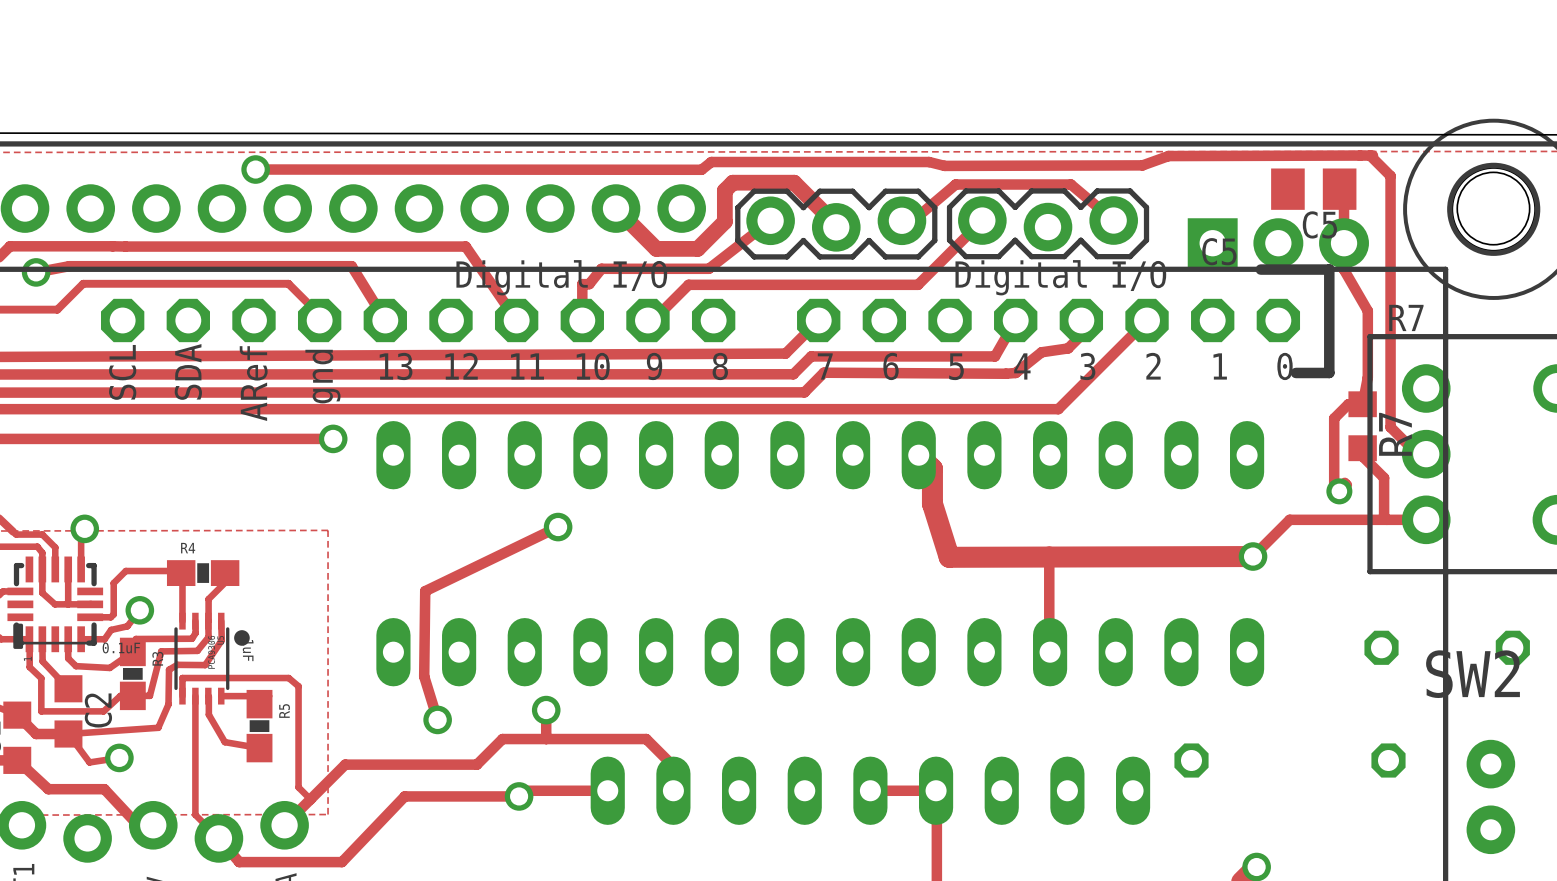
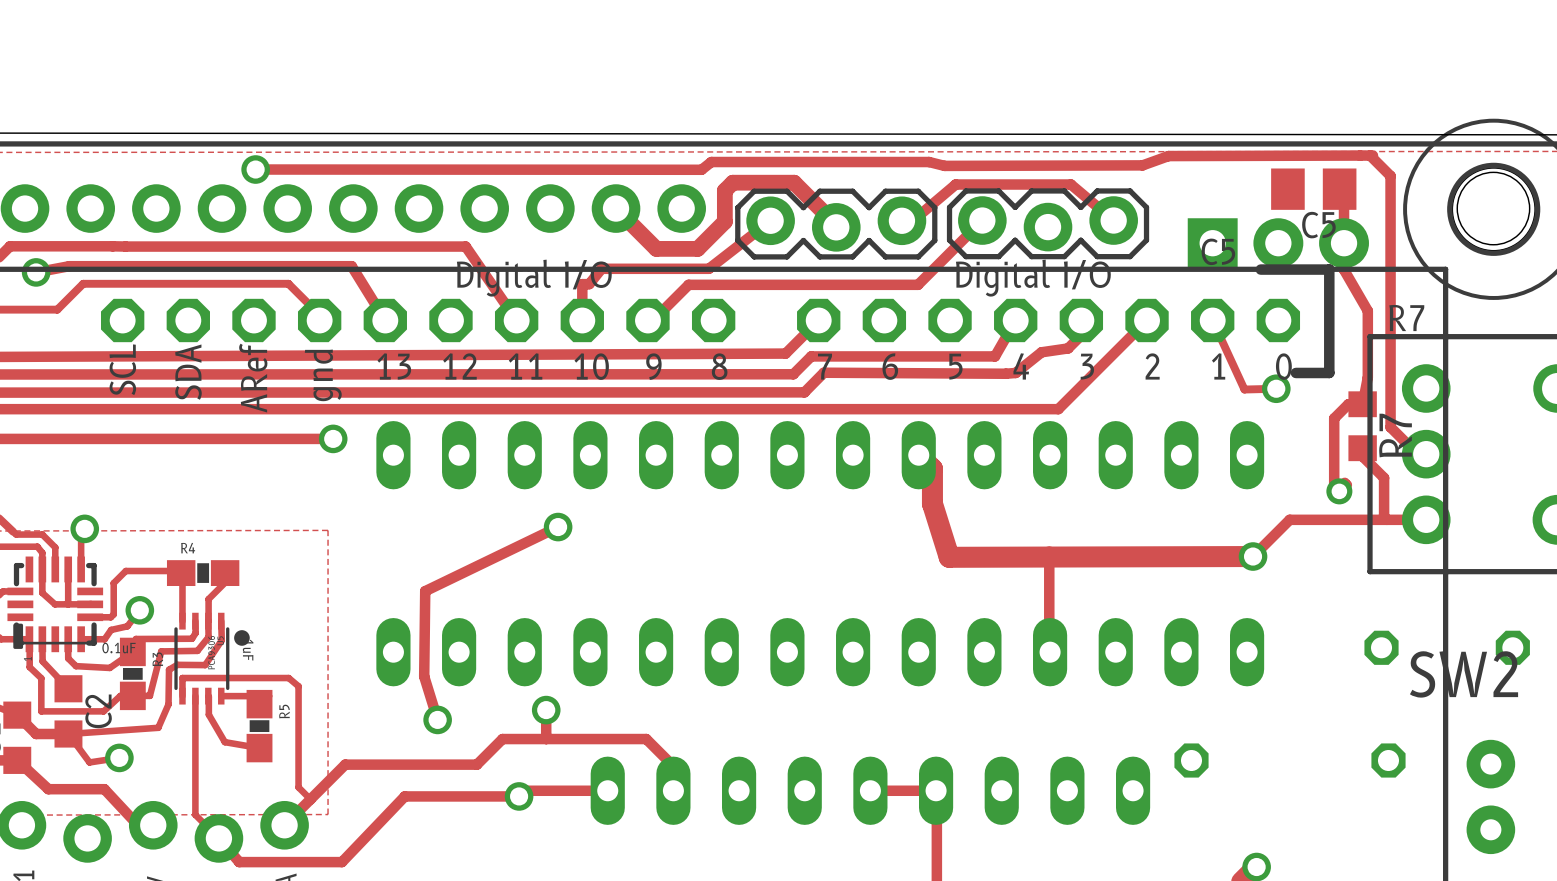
track: none -> (1212, 320) (1244, 389) (1276, 388)
via: none -> (1276, 388)

